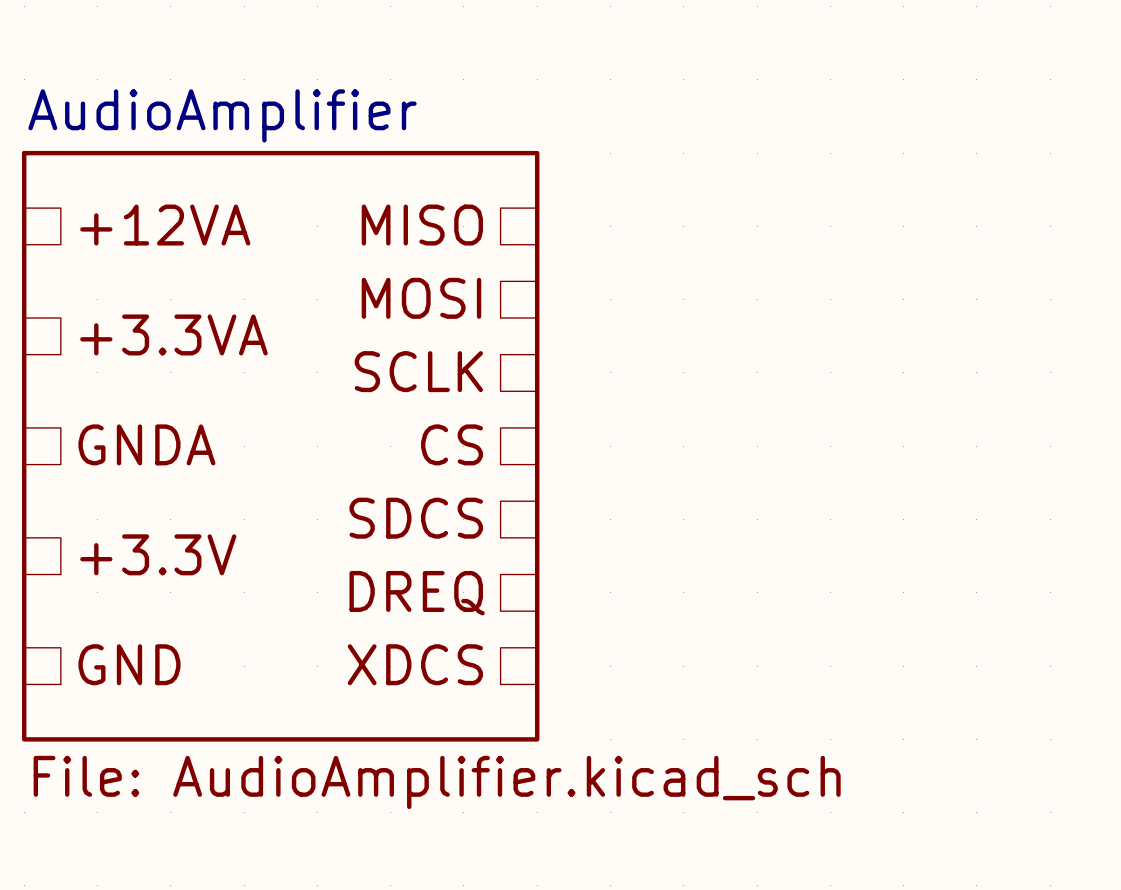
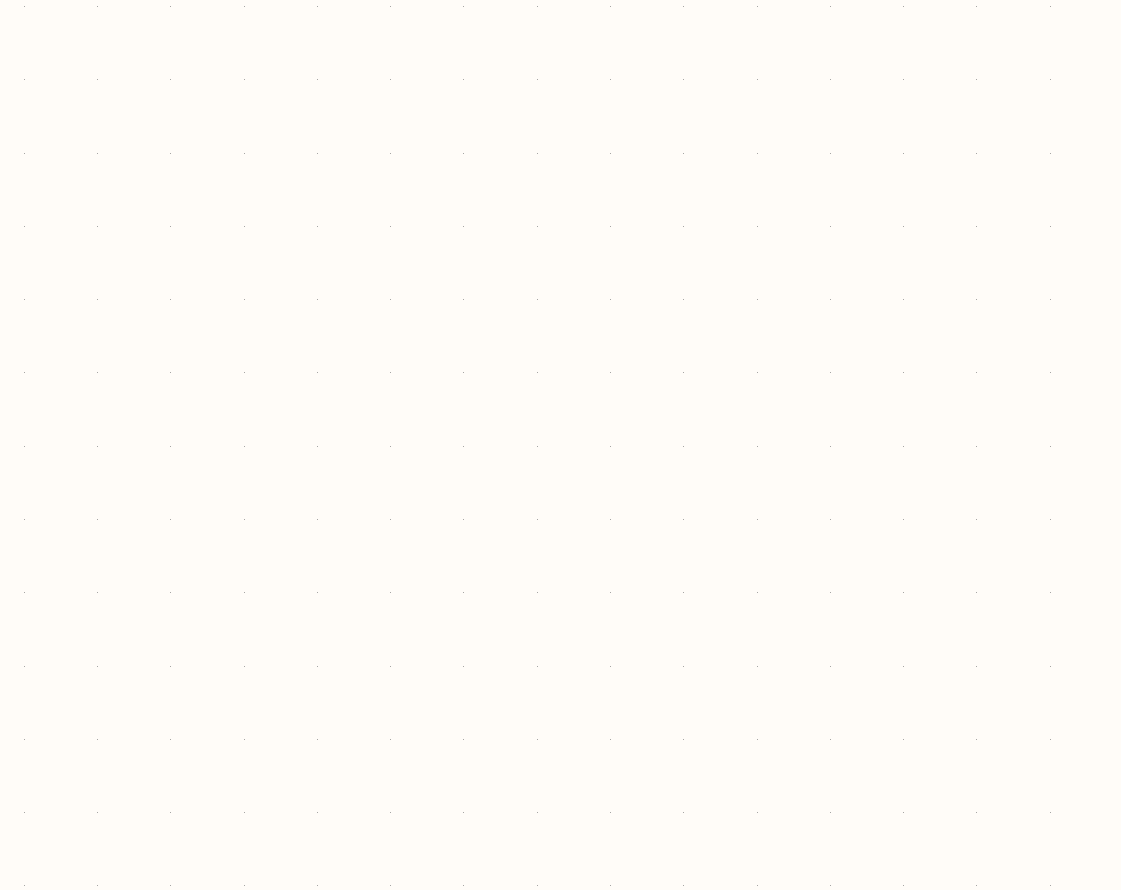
hierarchical label: +12VA (165, 225) -> none
hierarchical label: MISO (422, 225) -> none
hierarchical label: MOSI (421, 298) -> none
hierarchical label: +3.3VA (173, 334) -> none
hierarchical label: SCLK (418, 371) -> none
hierarchical label: GNDA (146, 444) -> none
hierarchical label: CS (452, 444) -> none
sheet AudioAmplifier: File: AudioAmplifier.kicad_sch (280, 446) -> none
hierarchical label: SDCS (416, 518) -> none
hierarchical label: +3.3V (158, 554) -> none
hierarchical label: DREQ (417, 593) -> none
hierarchical label: GND (129, 664) -> none
hierarchical label: XDCS (415, 664) -> none

